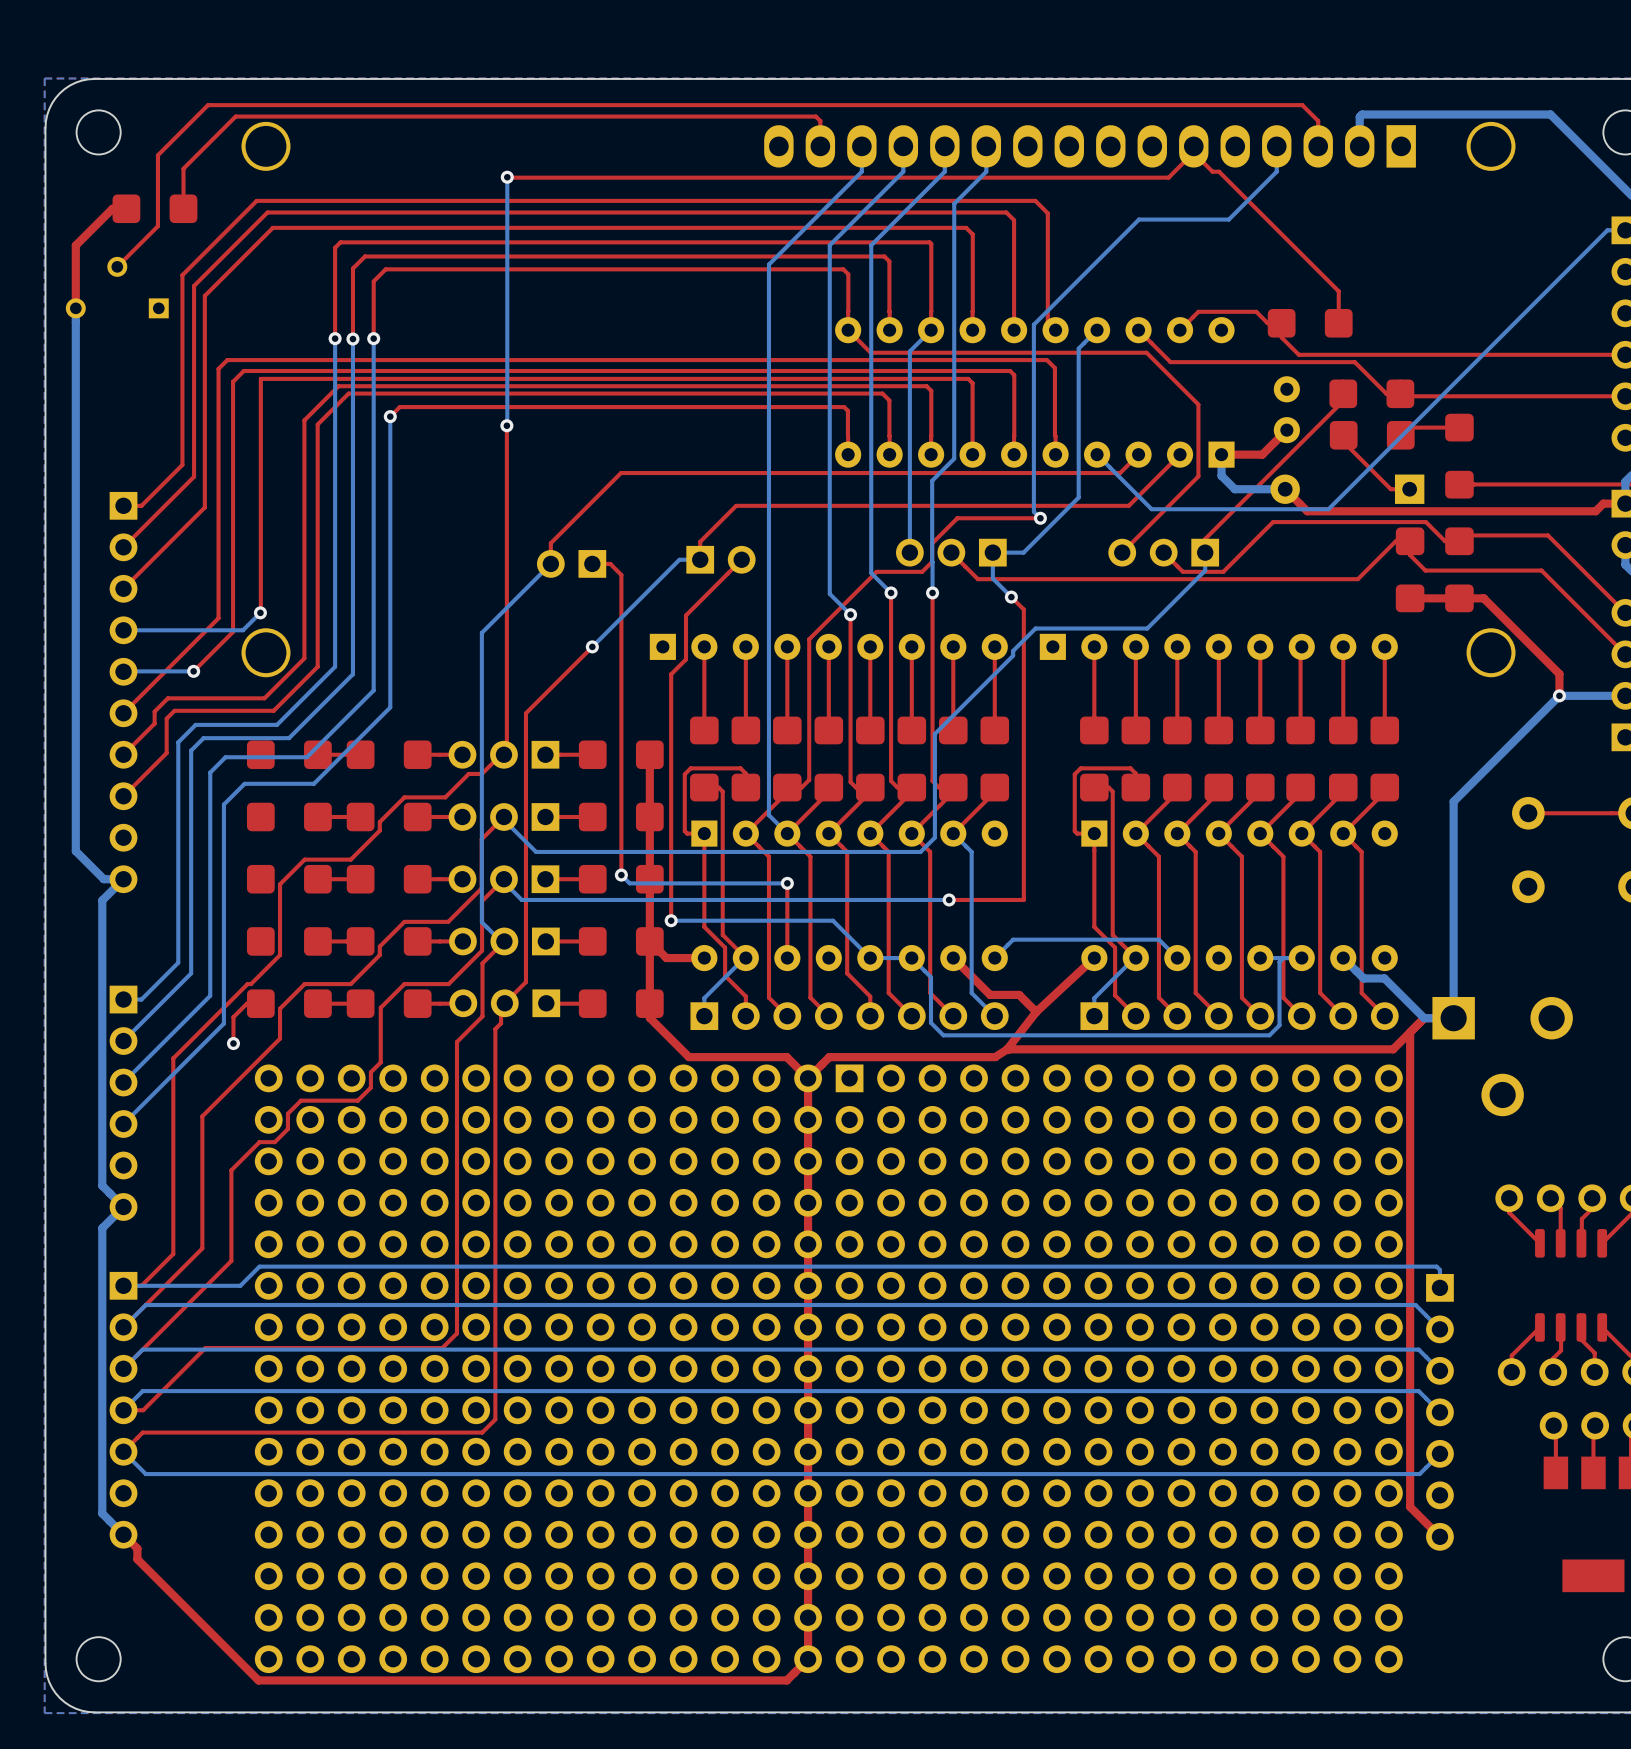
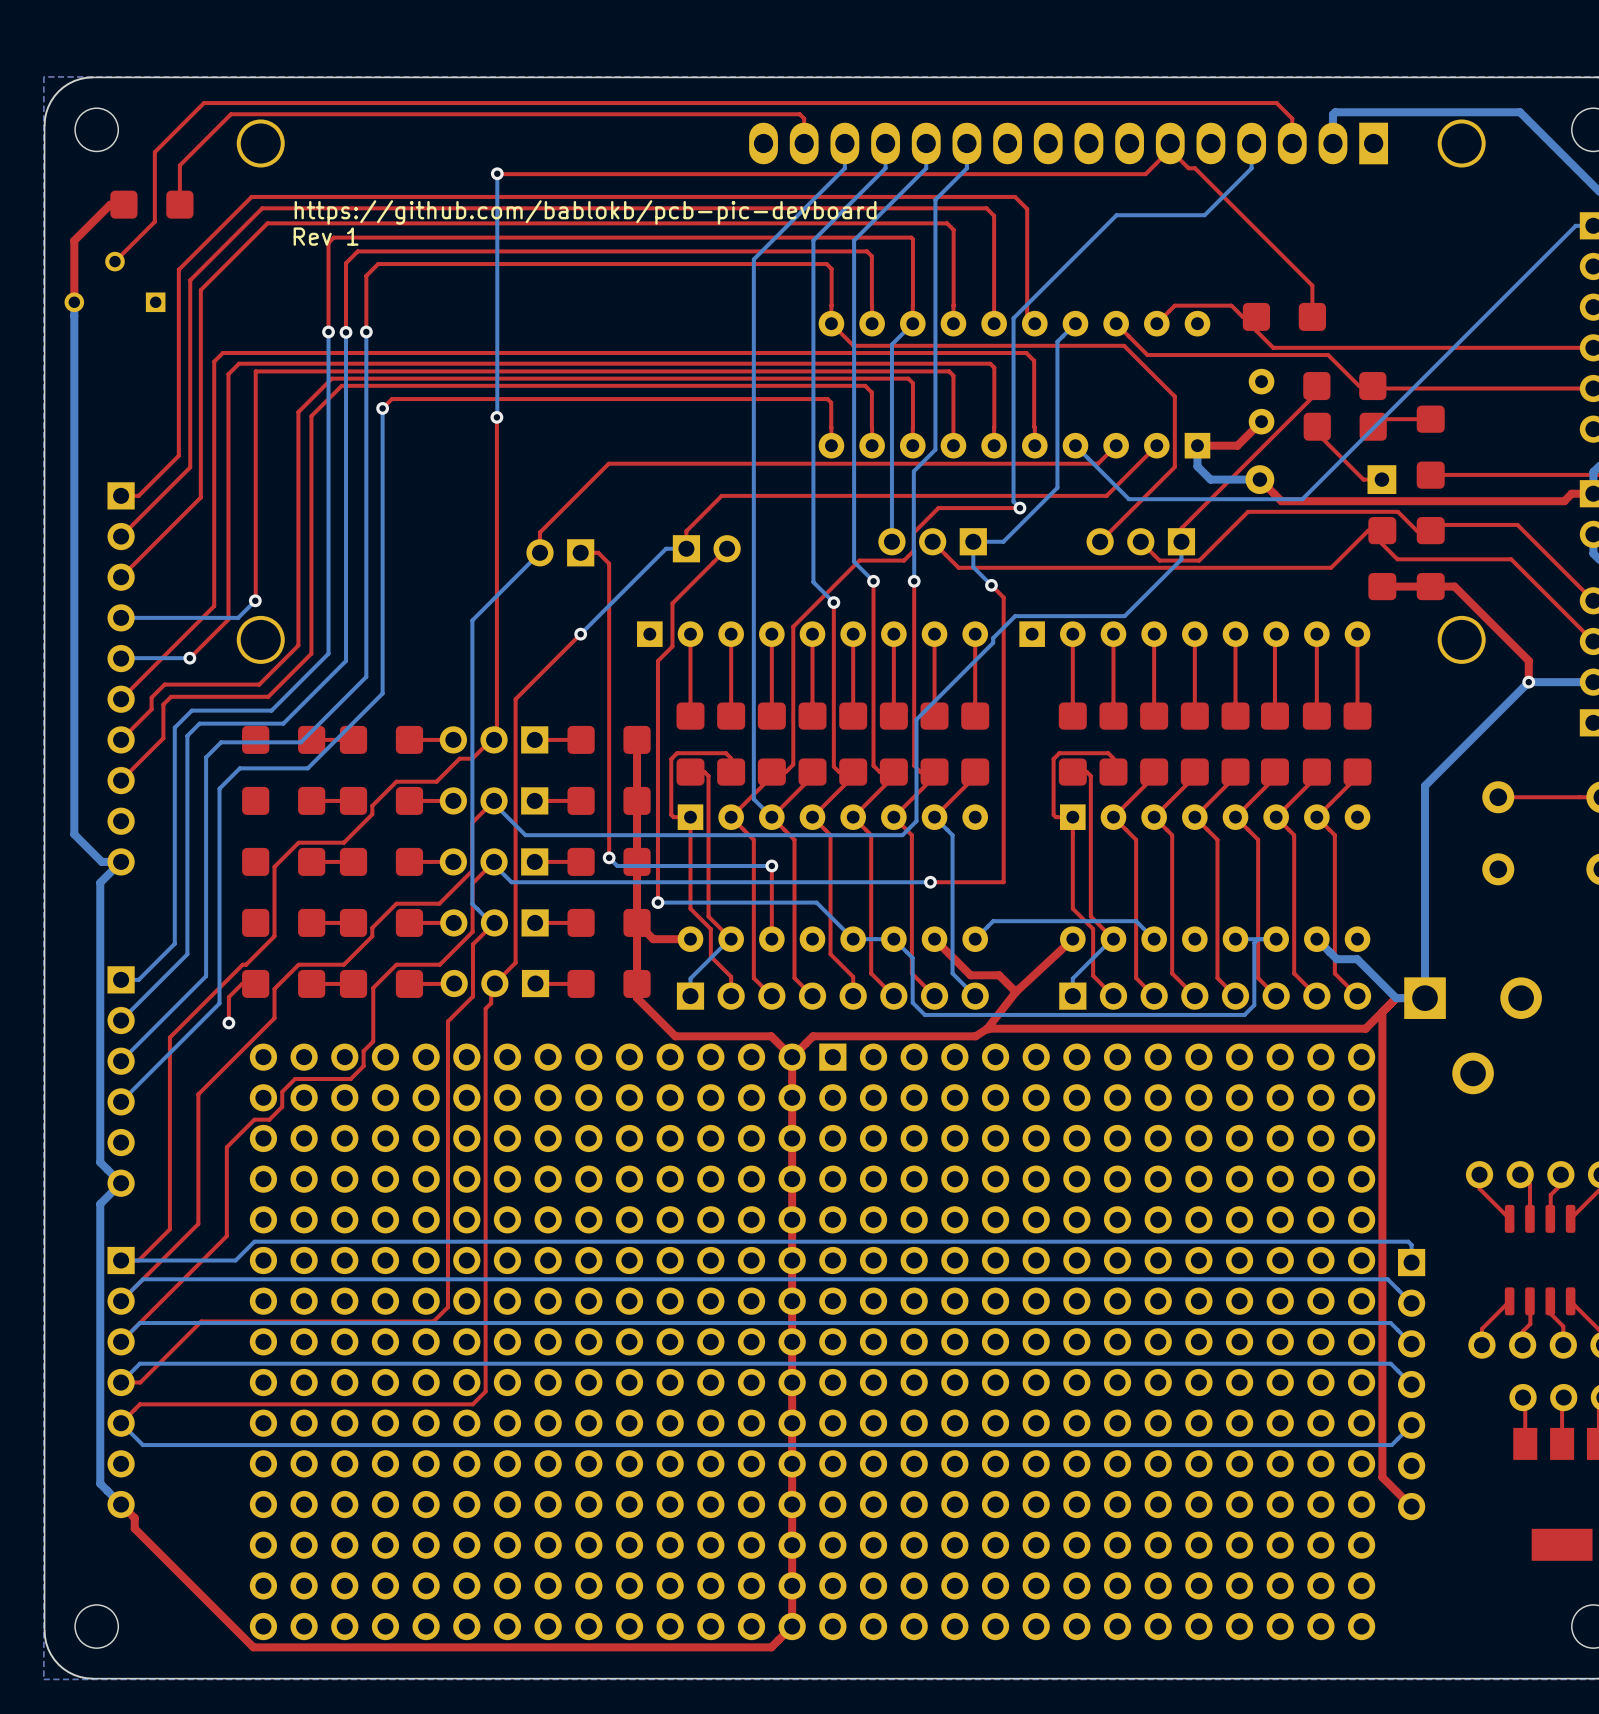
text: none -> https://github.com/bablokb/pcb-pic-devboard (585, 212)
text: none -> Rev 1 (326, 236)

